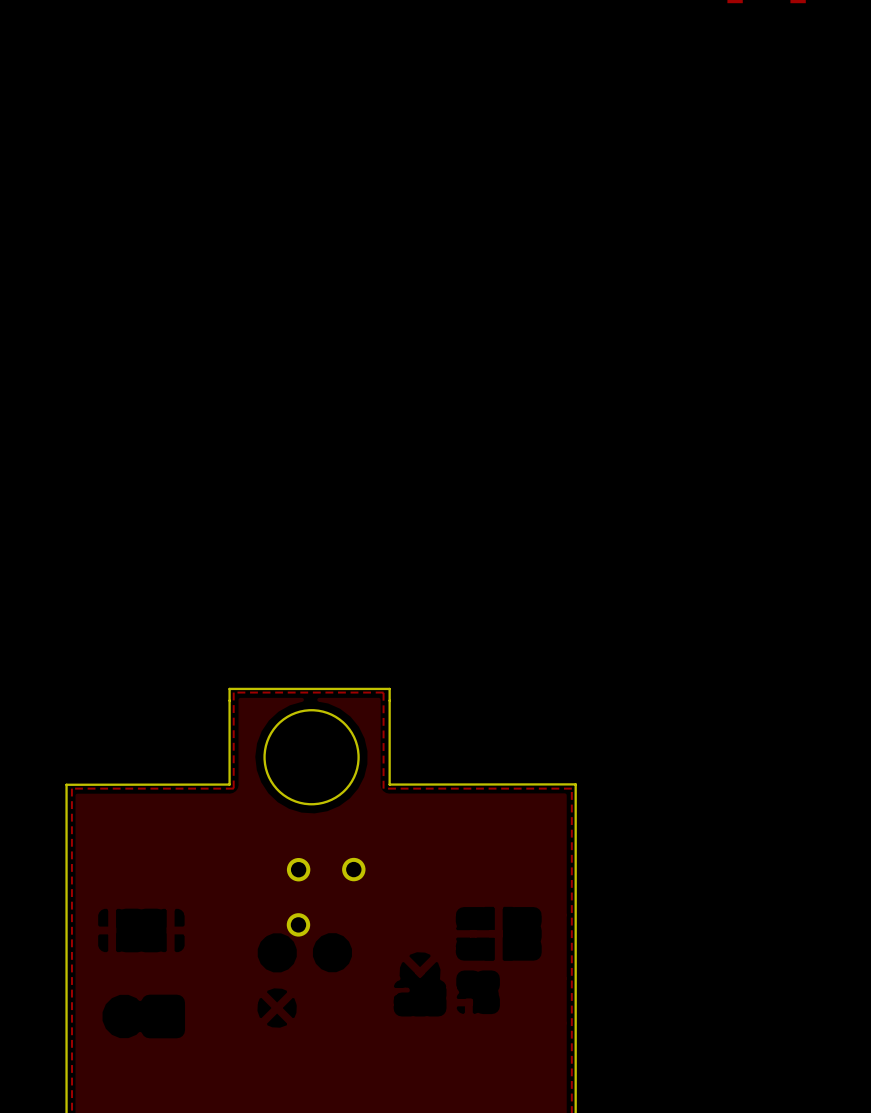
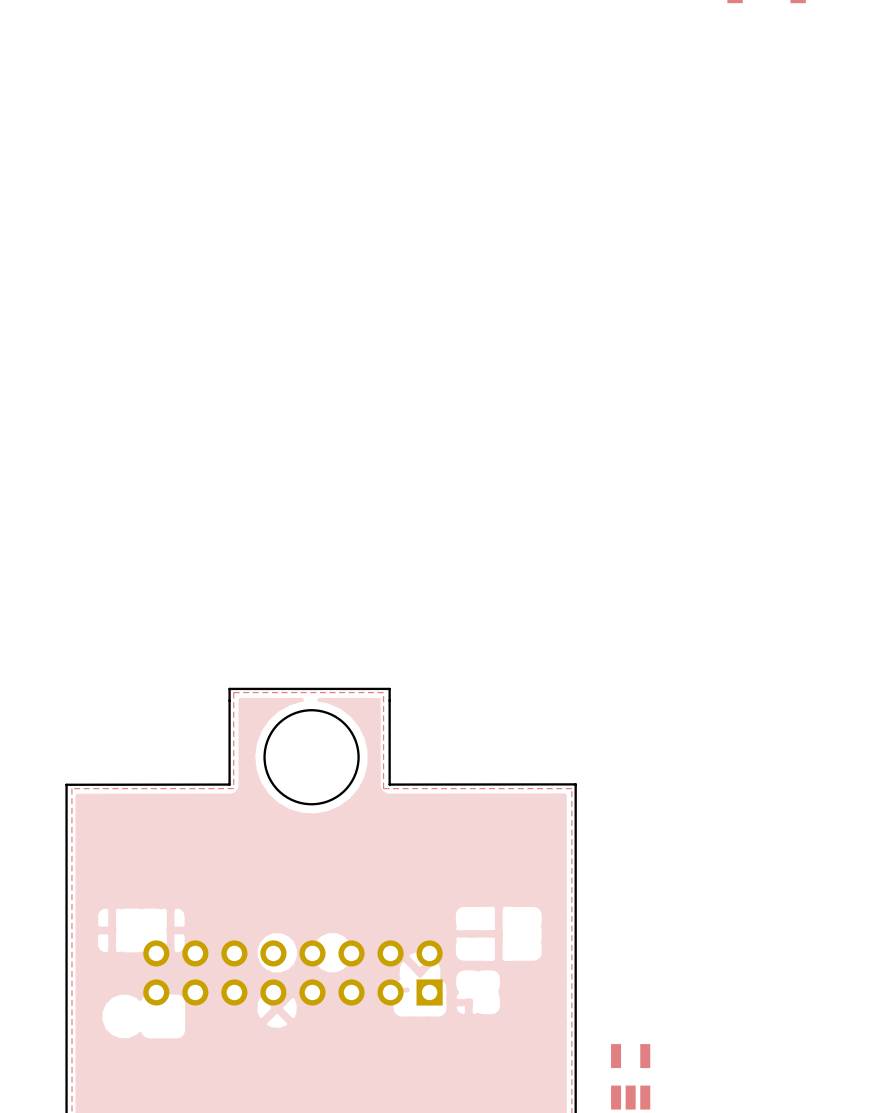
part: (326, 897) -> none
part: none -> (292, 972)
part: none -> (630, 1076)

